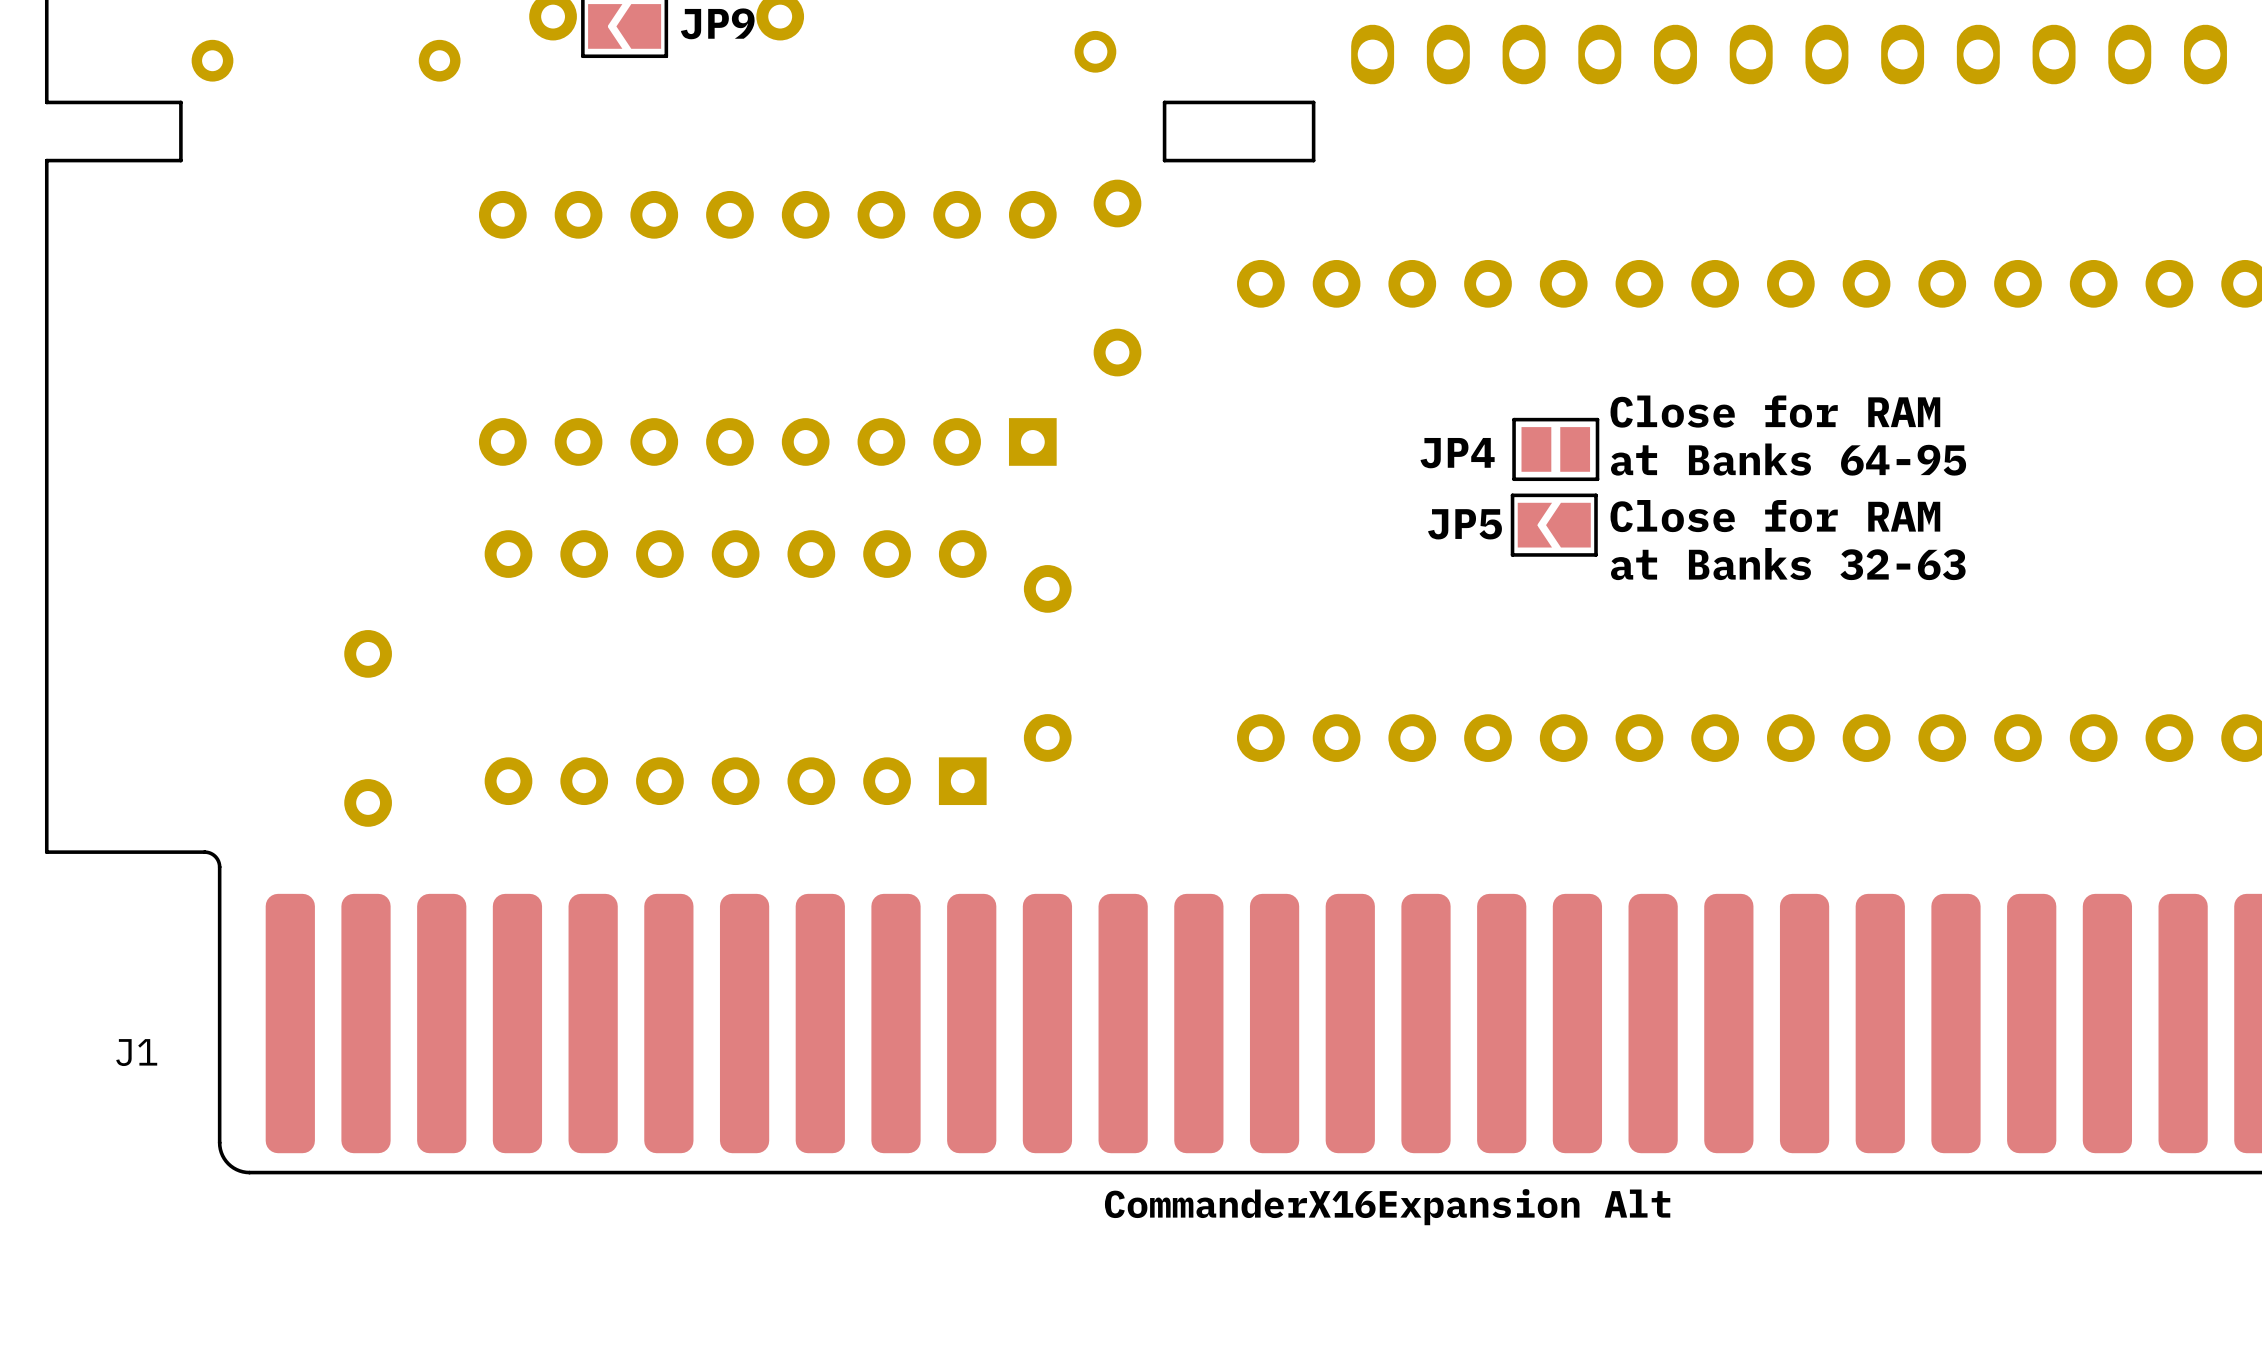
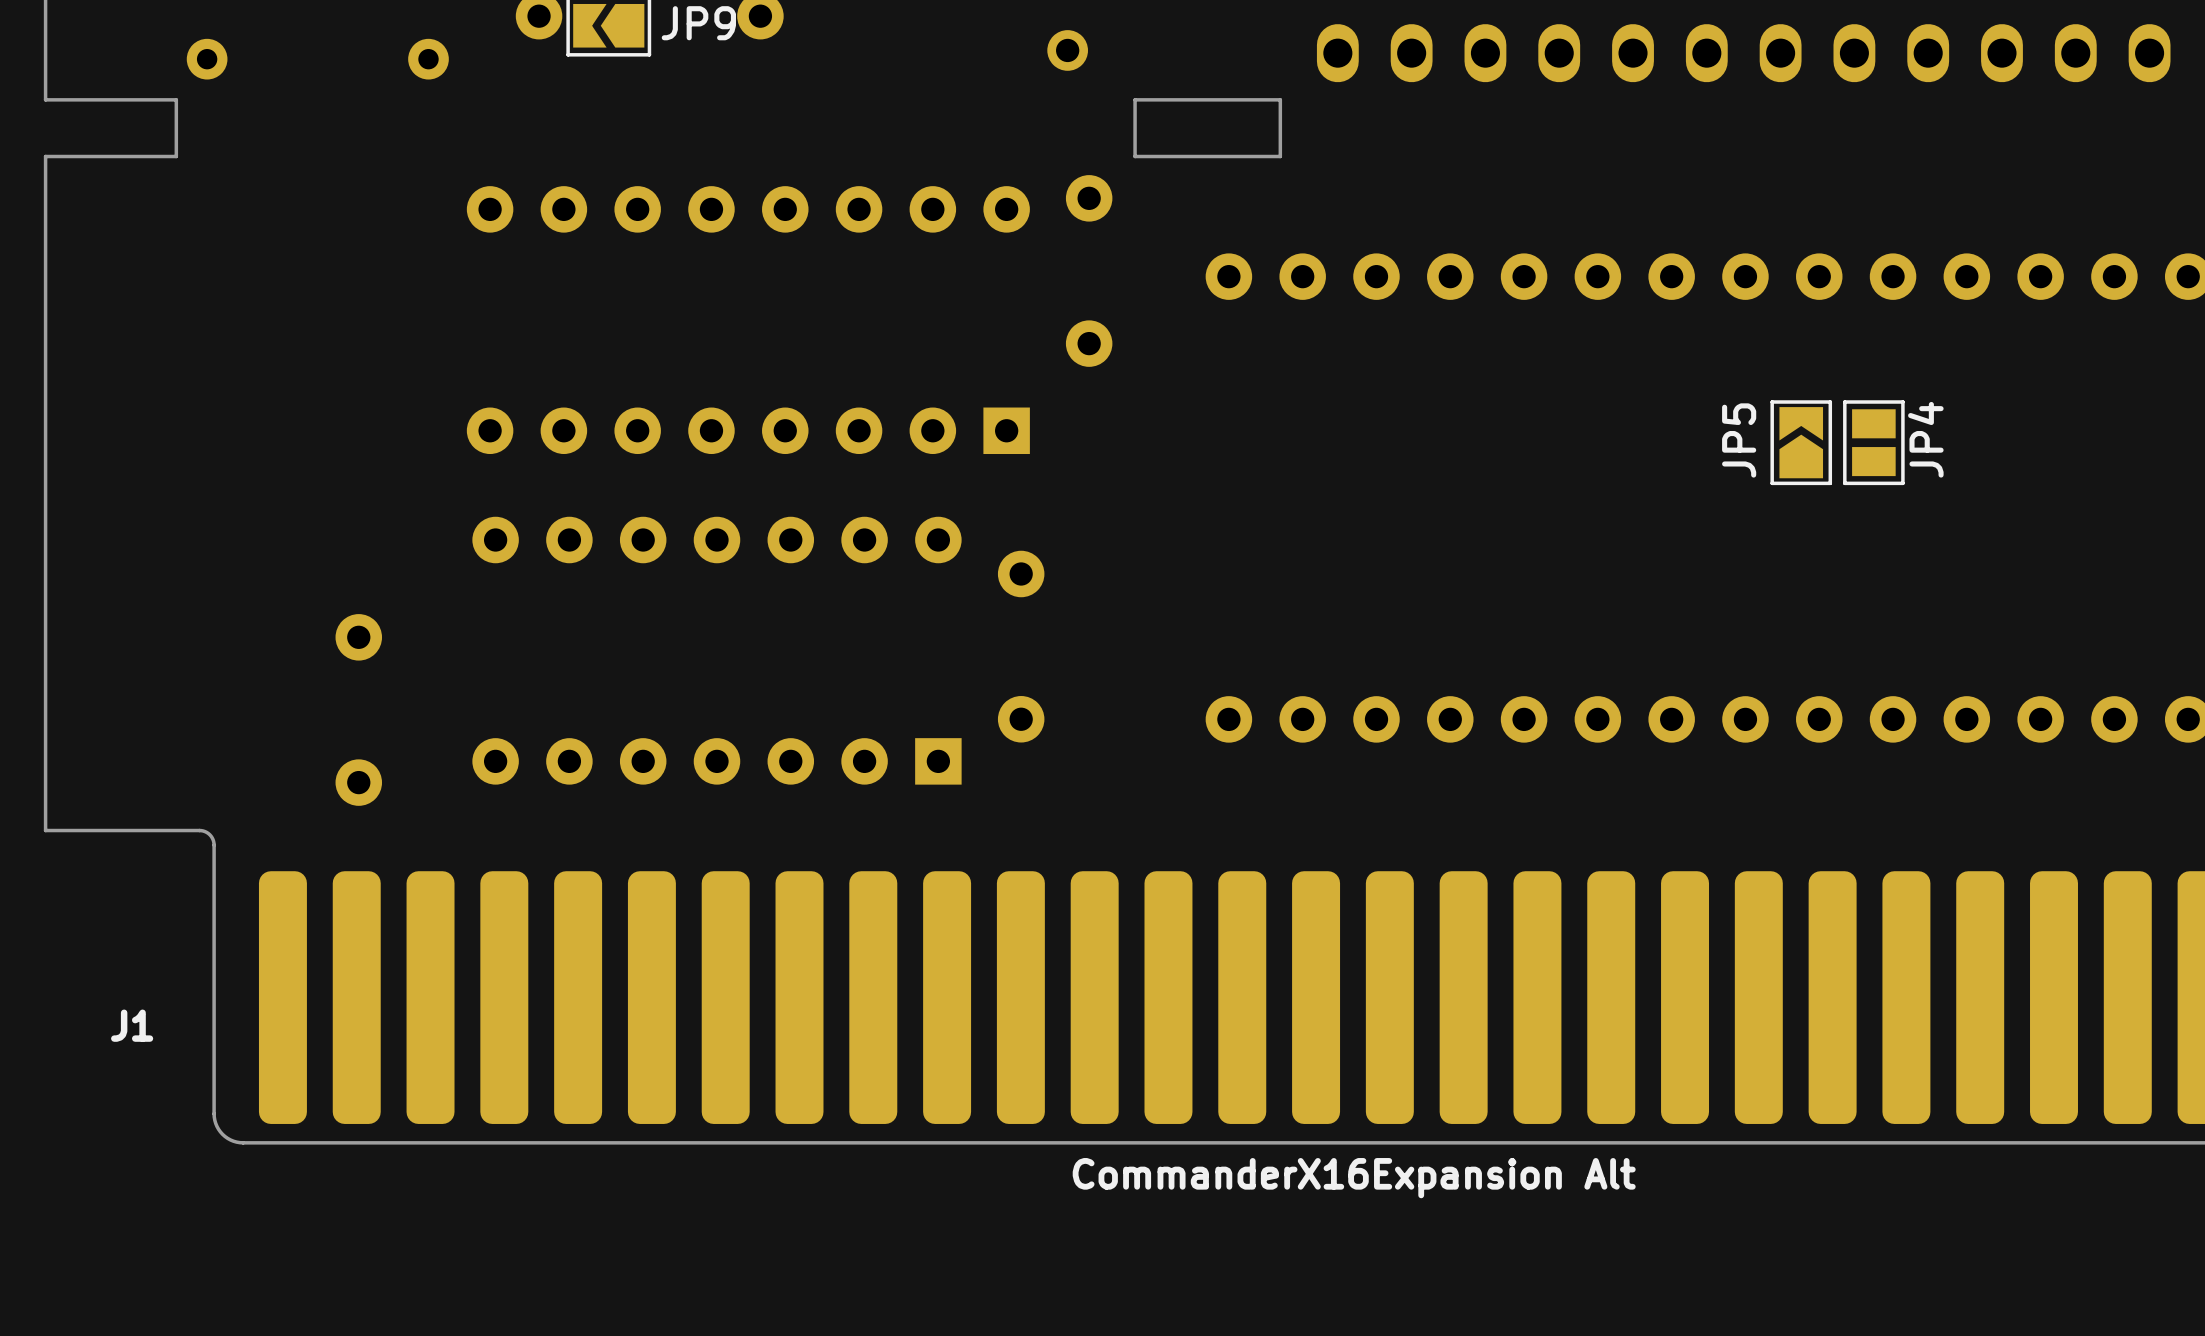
text: Close for RAM (1775, 411) -> none
JP4 rotation: 0° (1555, 449) -> 90° clockwise (1873, 442)
JP4 position: (1555, 449) -> (1873, 442)
JP4 name position: JP4 (1457, 453) -> JP4 (1925, 439)
text: at Banks 64-95 (1788, 459) -> none
text: Close for RAM (1775, 516) -> none
JP5 rotation: 0° (1554, 525) -> 90° clockwise (1801, 442)
JP5 position: (1554, 525) -> (1801, 442)
text: at Banks 32-63 (1788, 564) -> none

